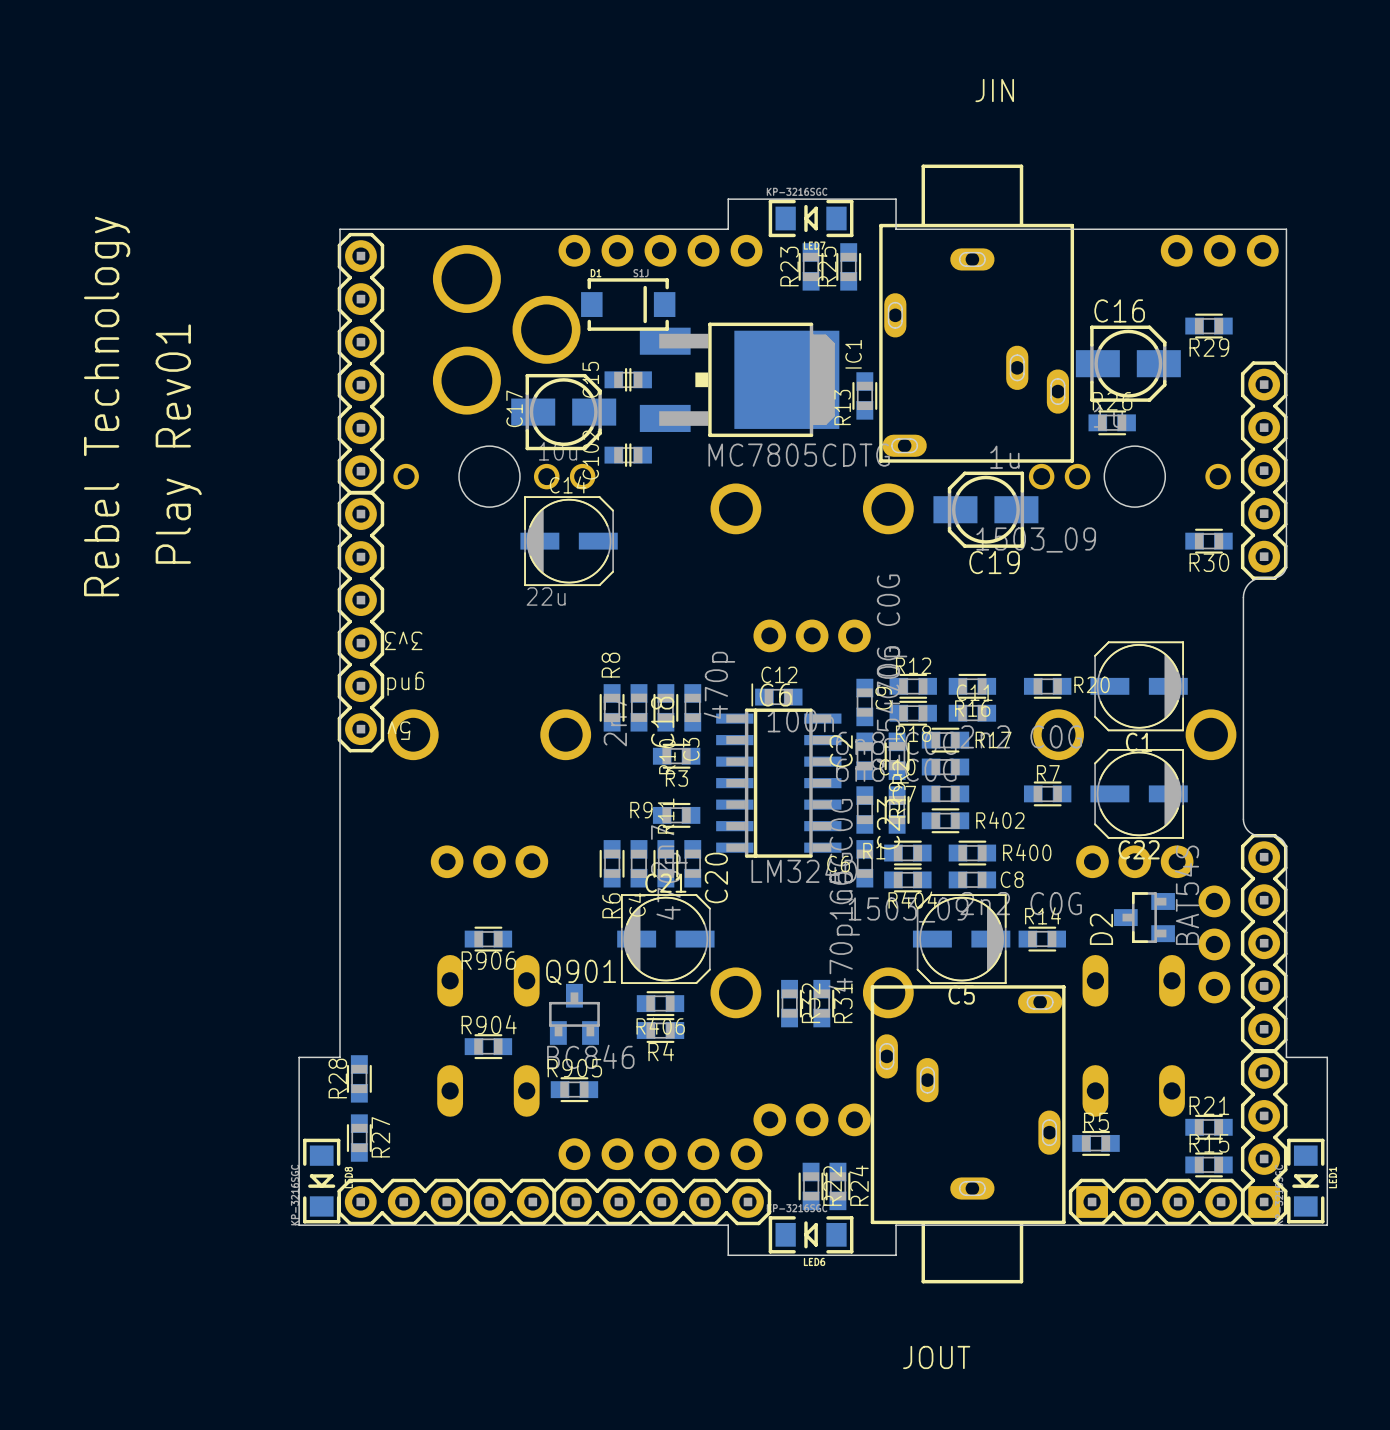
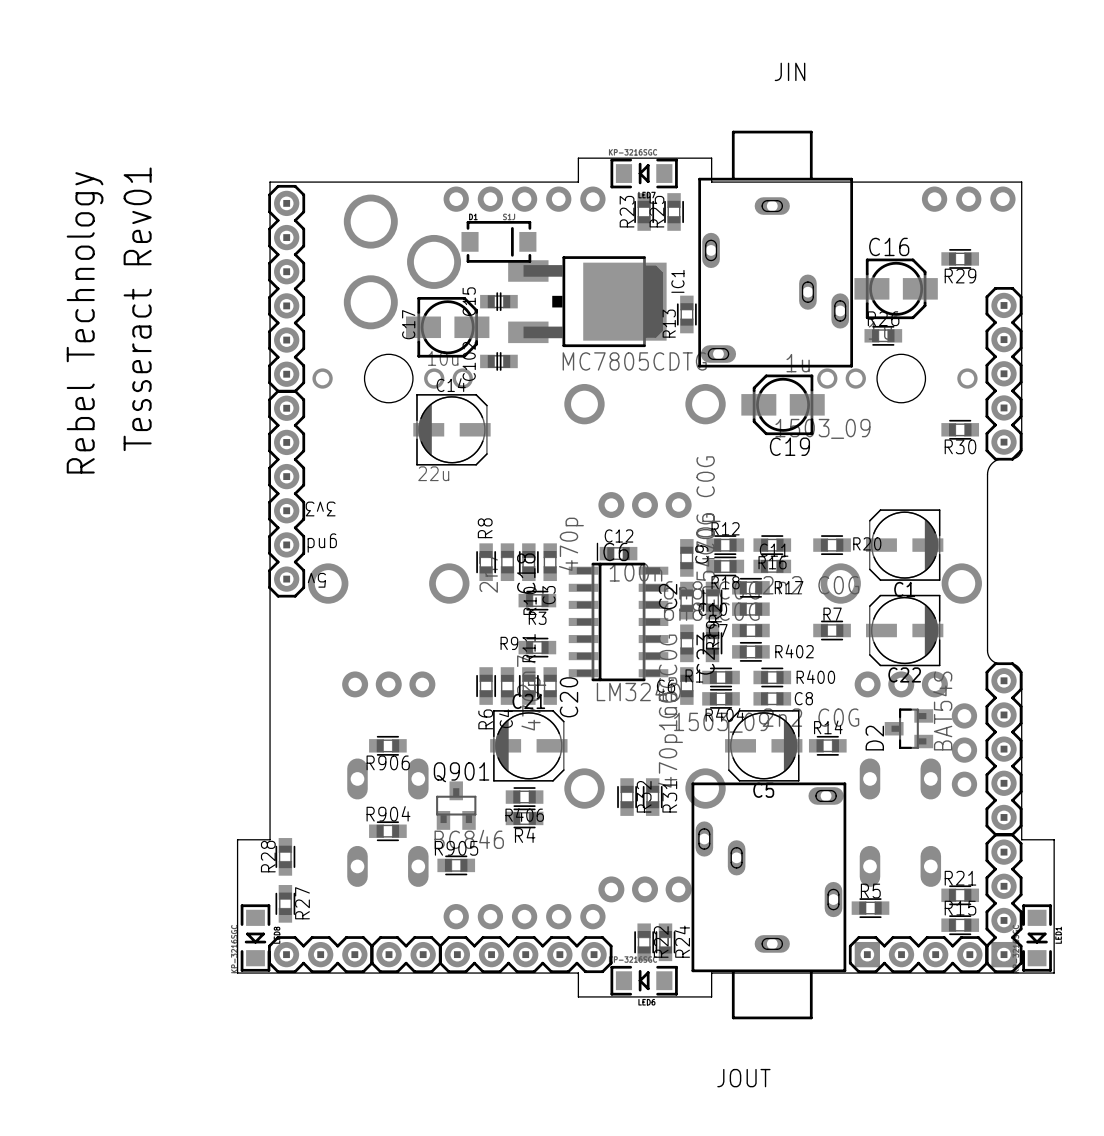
text: Play Rev01 (178, 444) -> Tesseract Rev01 (137, 309)

